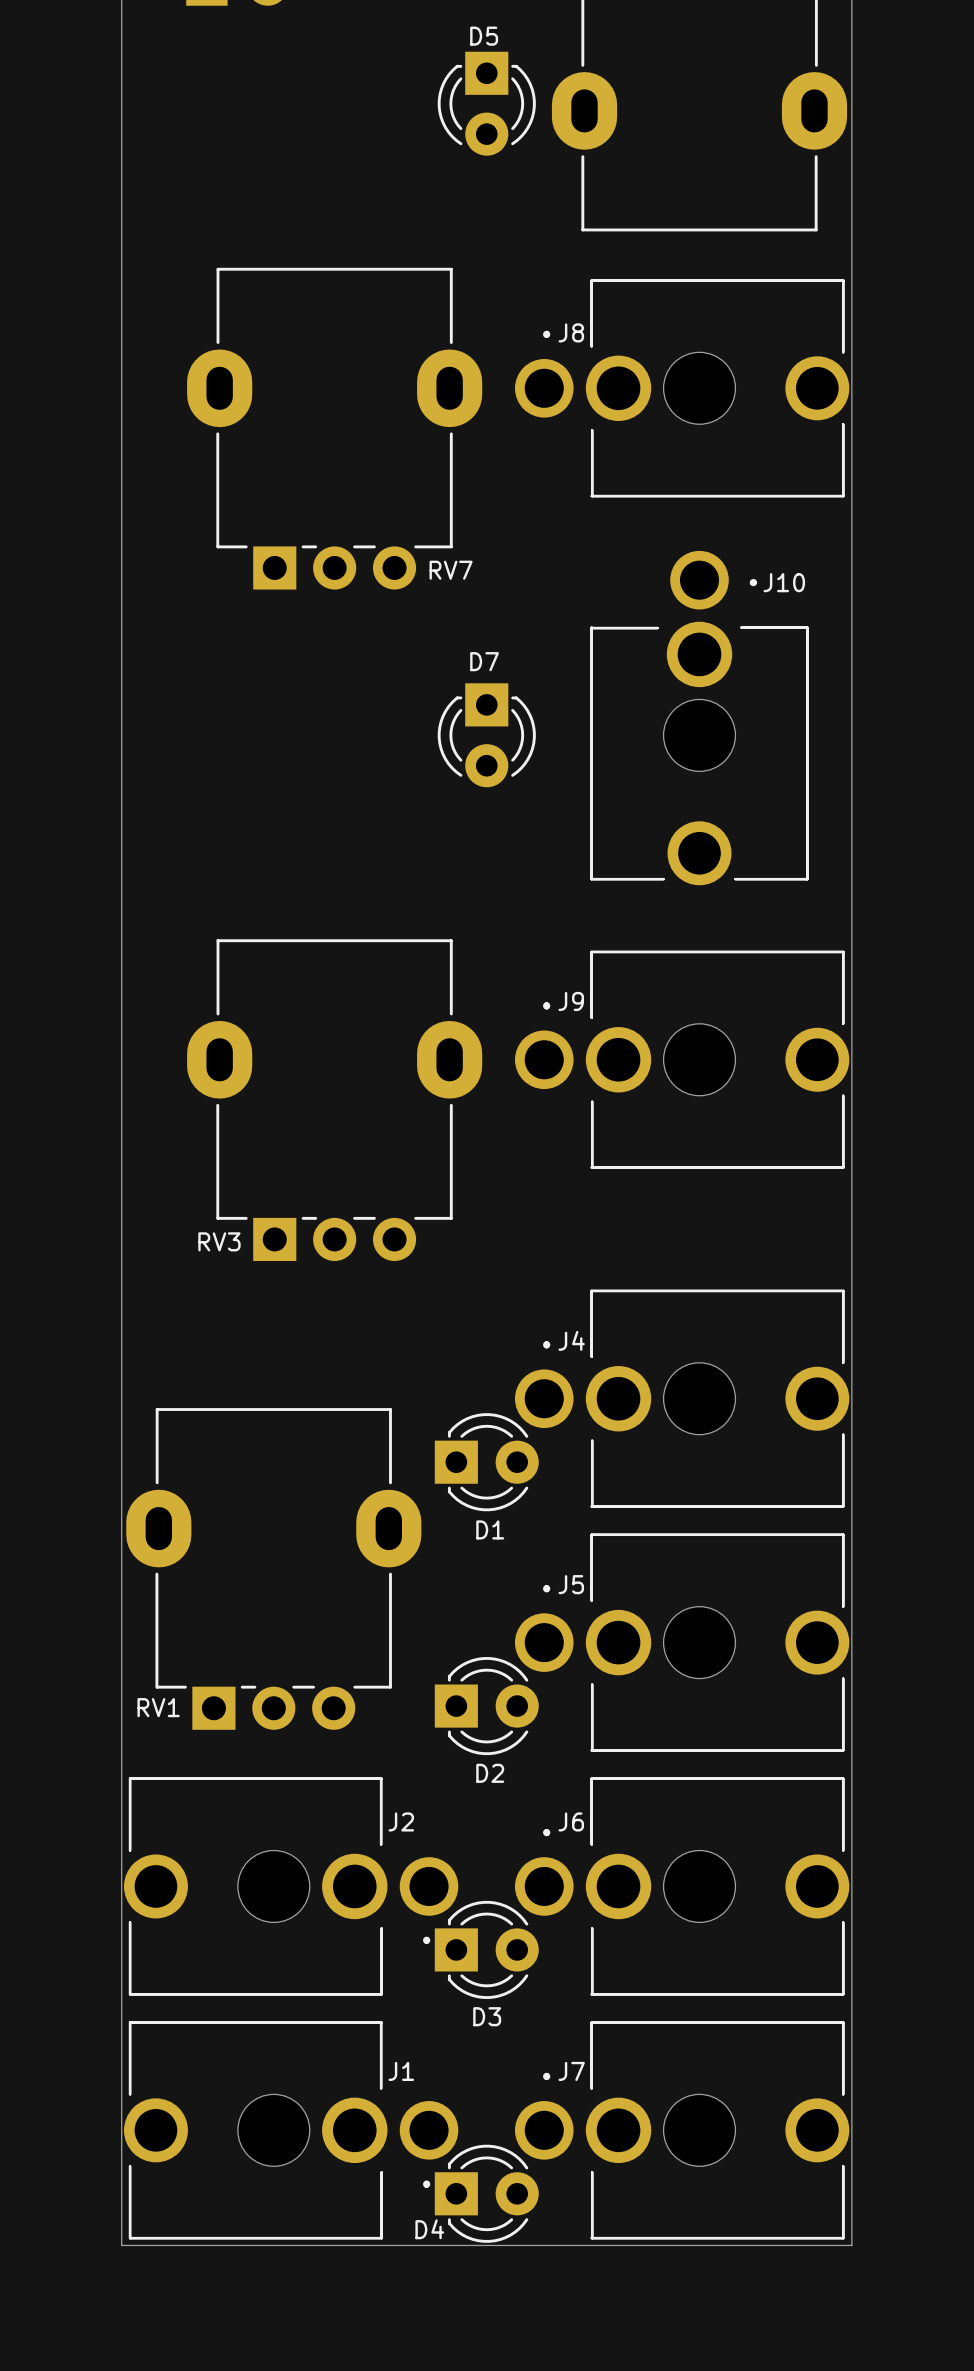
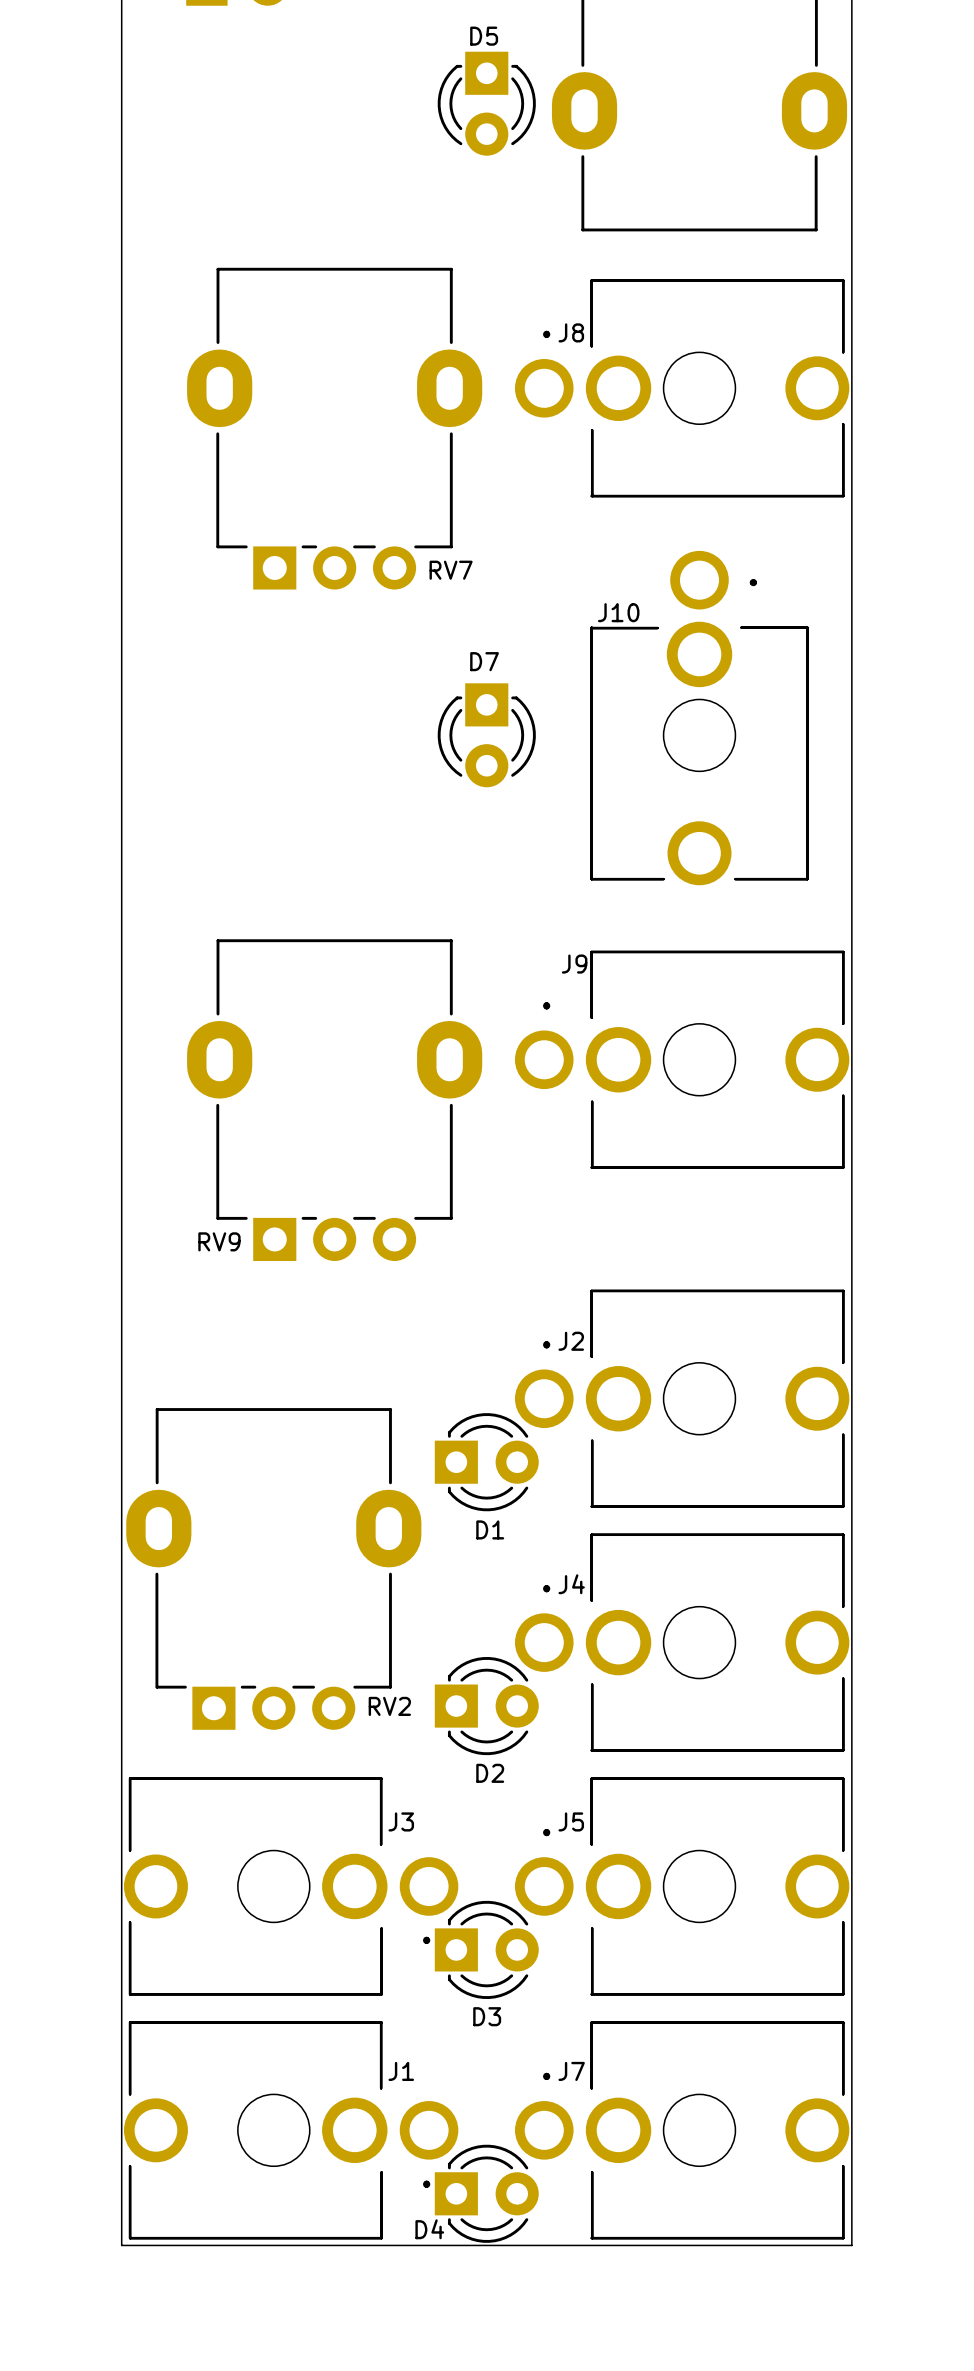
J10 name position: J10 (784, 582) -> J10 (618, 612)
J9 name position: J9 (571, 1001) -> J9 (574, 964)
RV3 name: RV3 (219, 1241) -> RV9 (219, 1241)
J4 name: J4 (571, 1340) -> J2 (571, 1341)
J5 name: J5 (571, 1584) -> J4 (571, 1584)
RV1 name: RV1 (158, 1707) -> RV2 (389, 1706)
J2 name: J2 (401, 1821) -> J3 (401, 1821)
J6 name: J6 (571, 1821) -> J5 (571, 1821)

